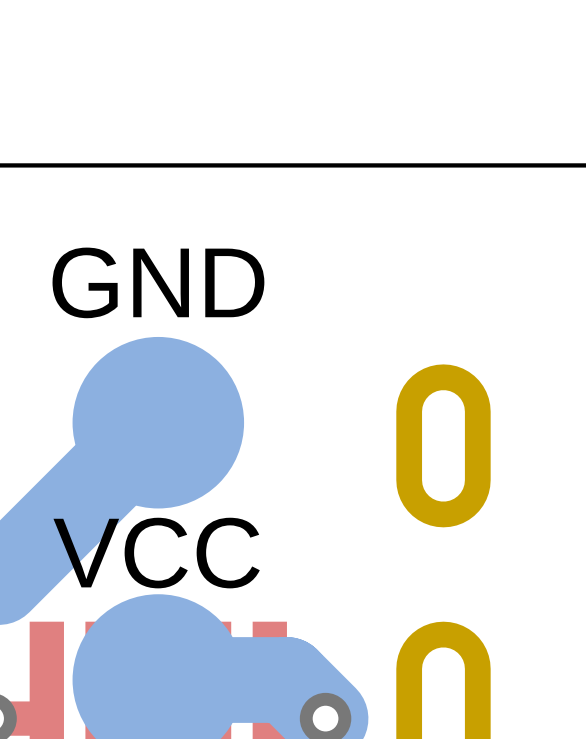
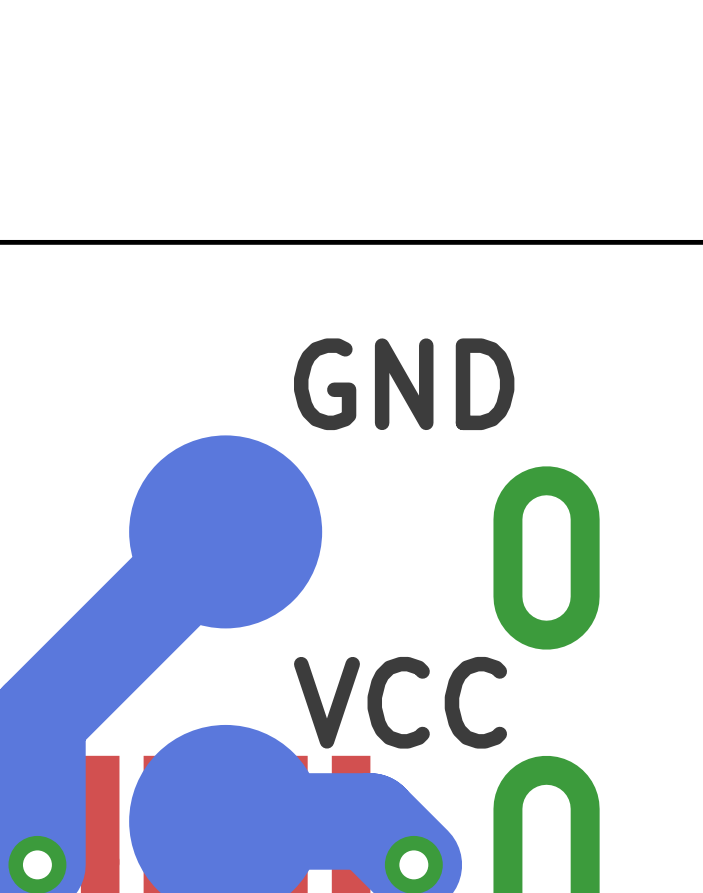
text position: GND (158, 282) -> GND (404, 384)
text position: VCC (156, 553) -> VCC (400, 702)

